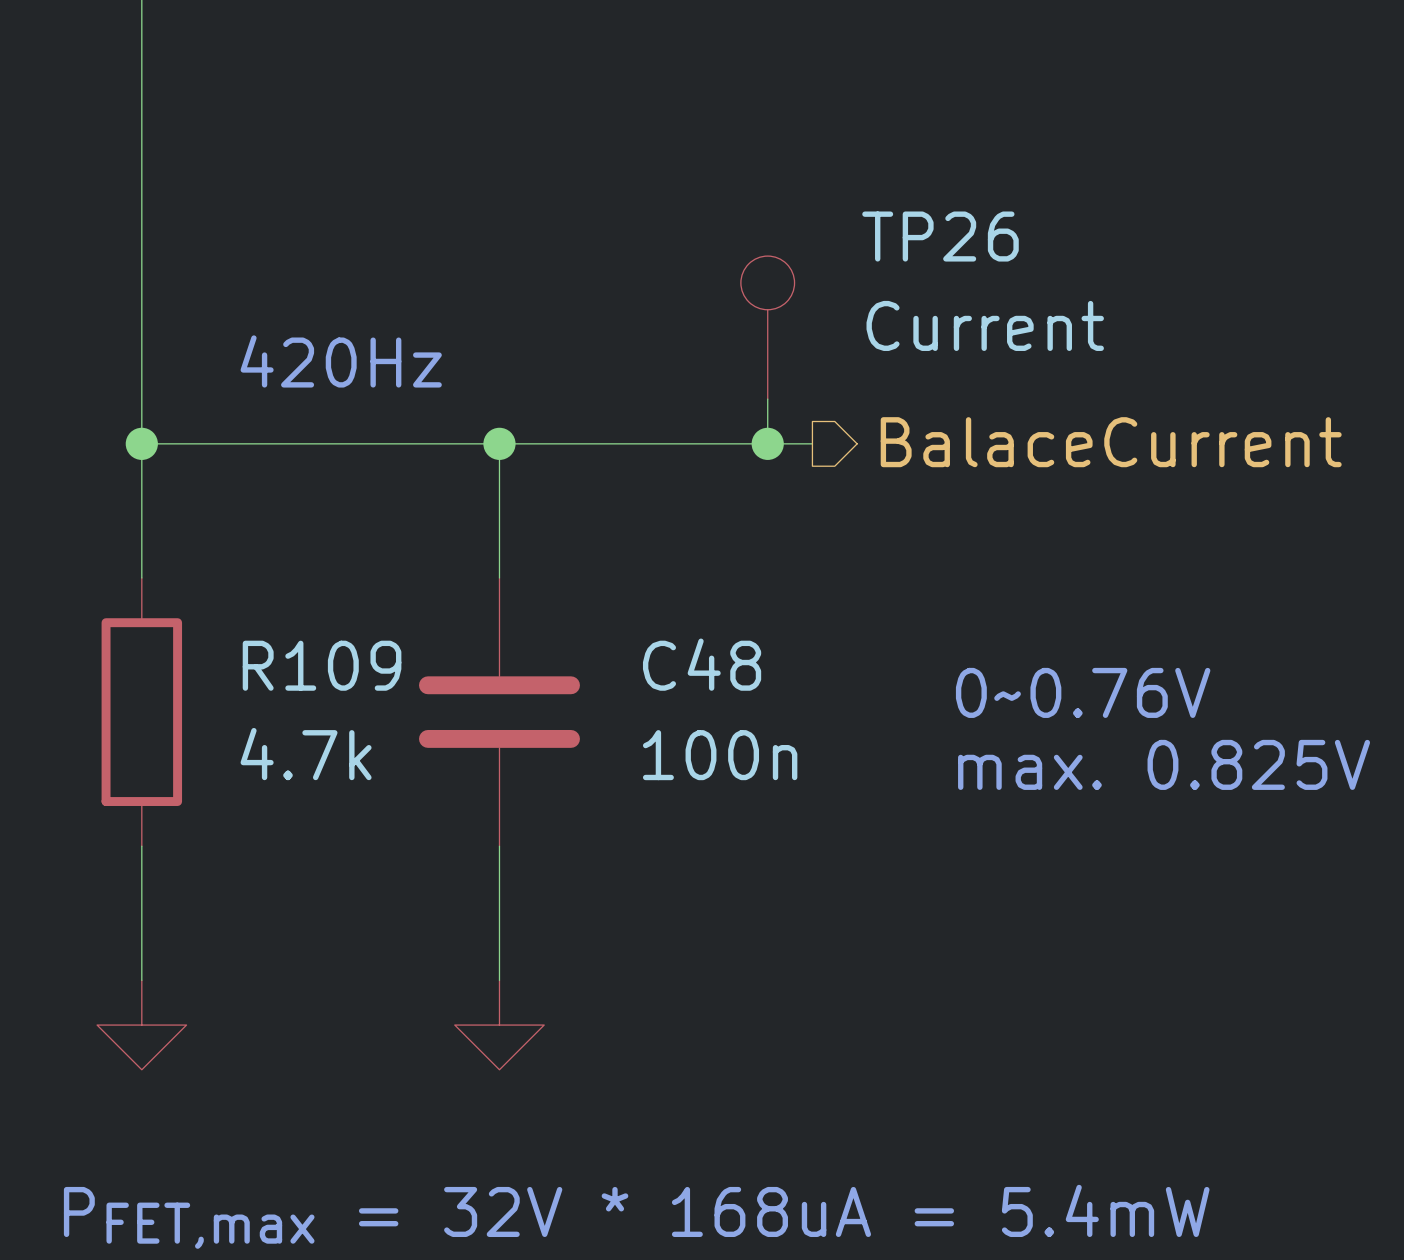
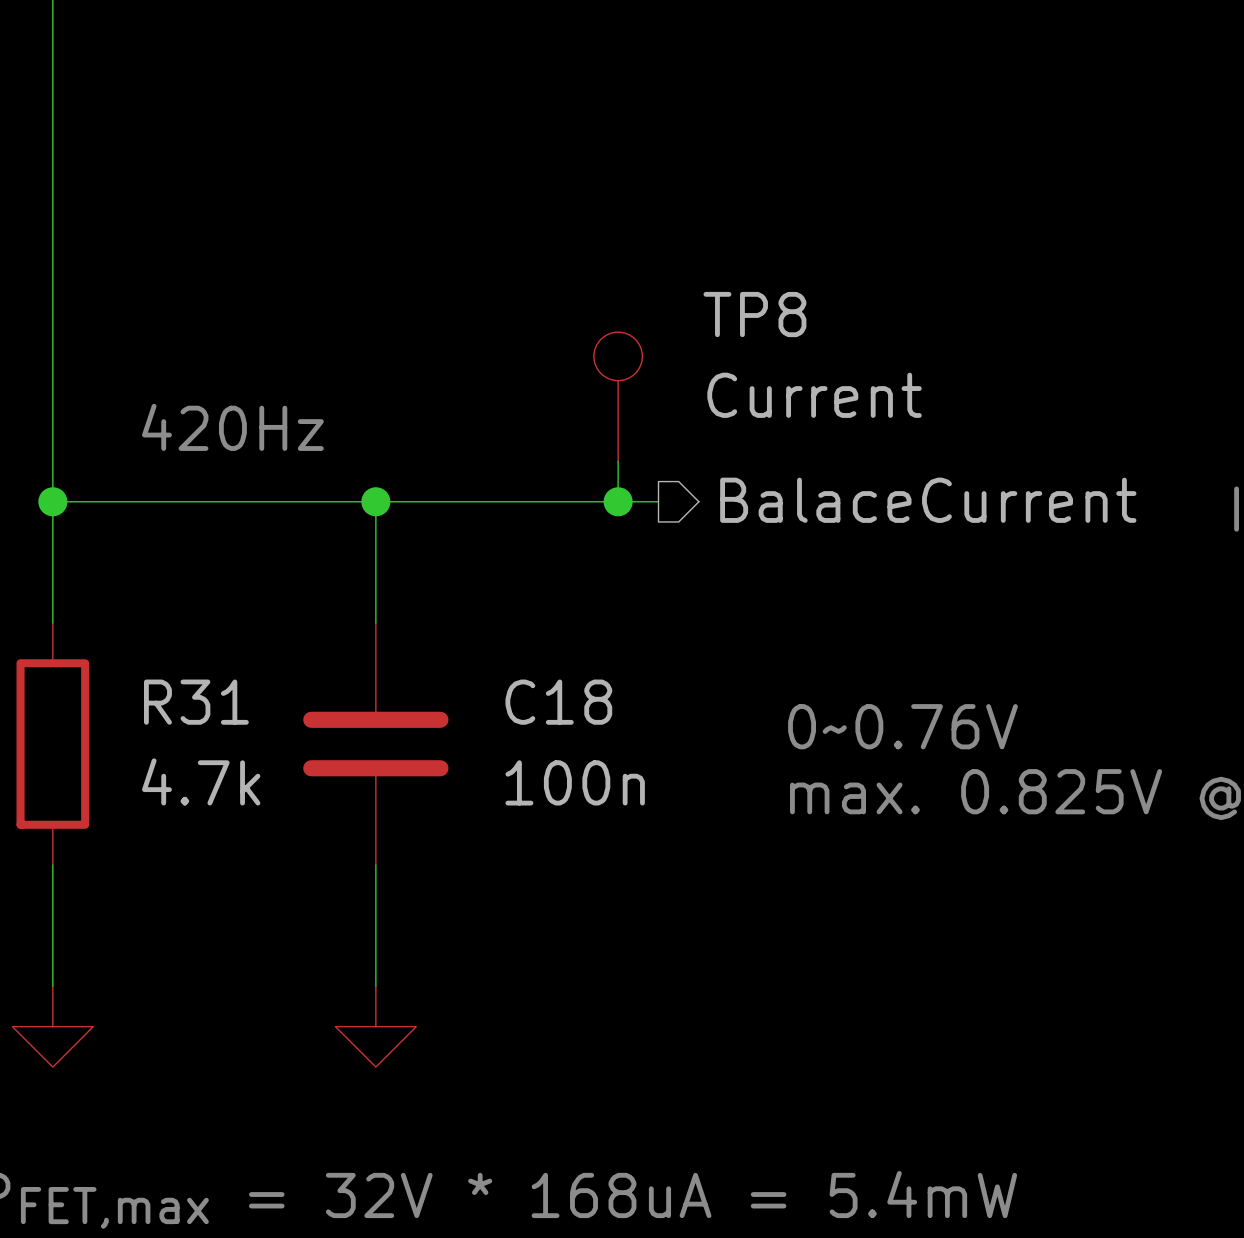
TP26 name: TP26 (940, 236) -> TP8 (754, 314)
C48 name: C48 (702, 664) -> C18 (558, 702)
R109 name: R109 (322, 665) -> R31 (196, 702)

